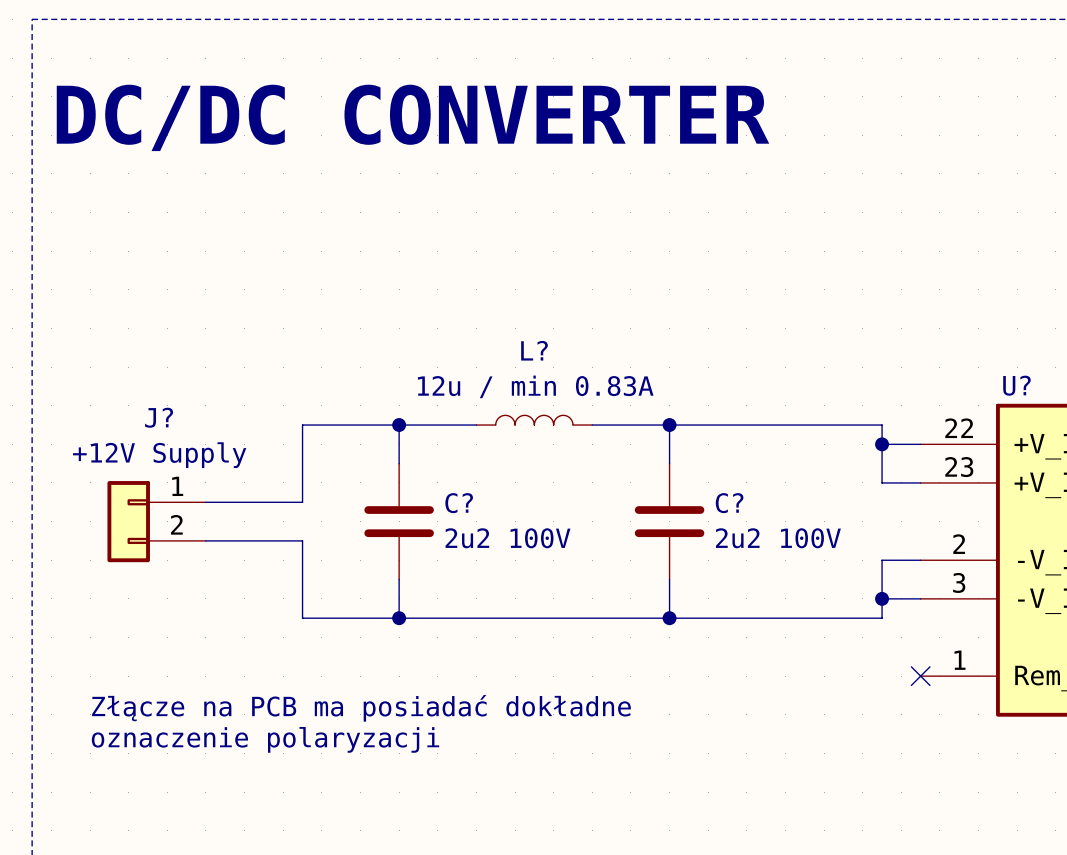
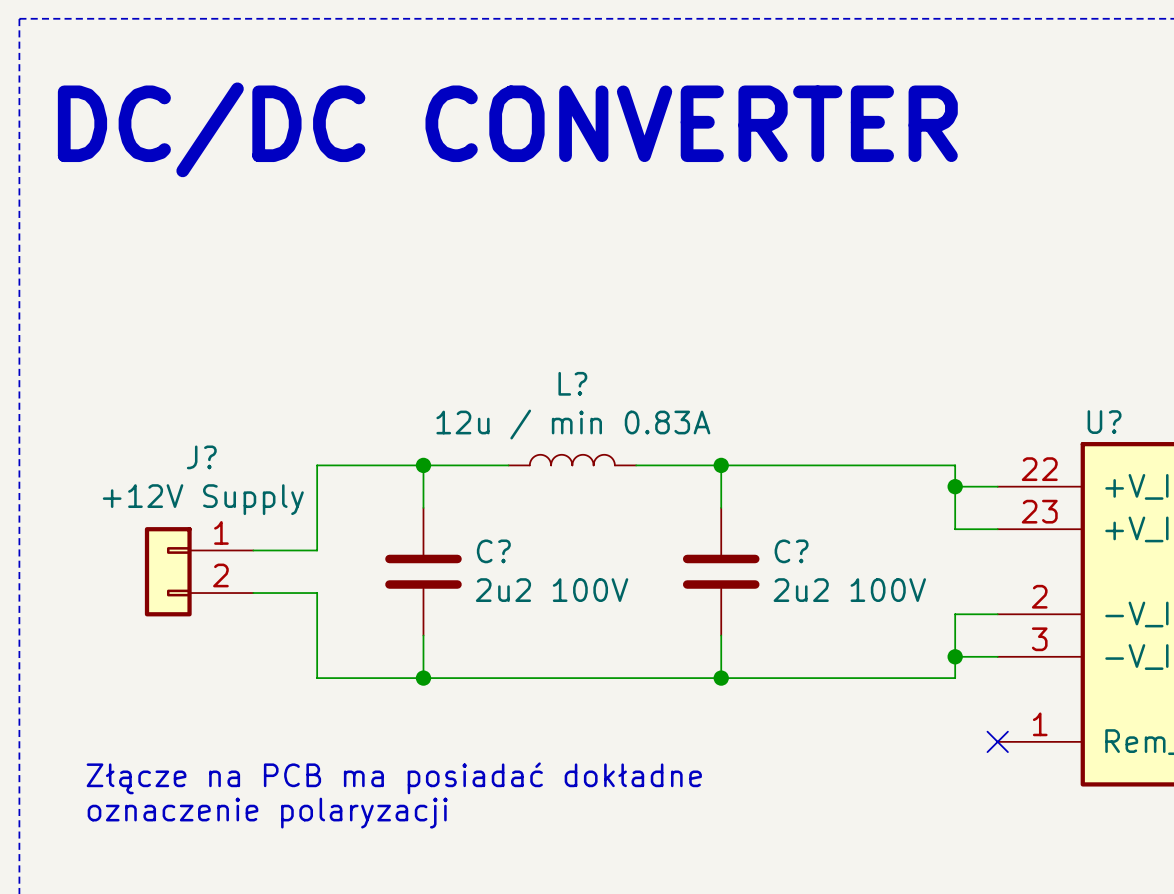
J? position: (156, 521) -> (199, 571)

